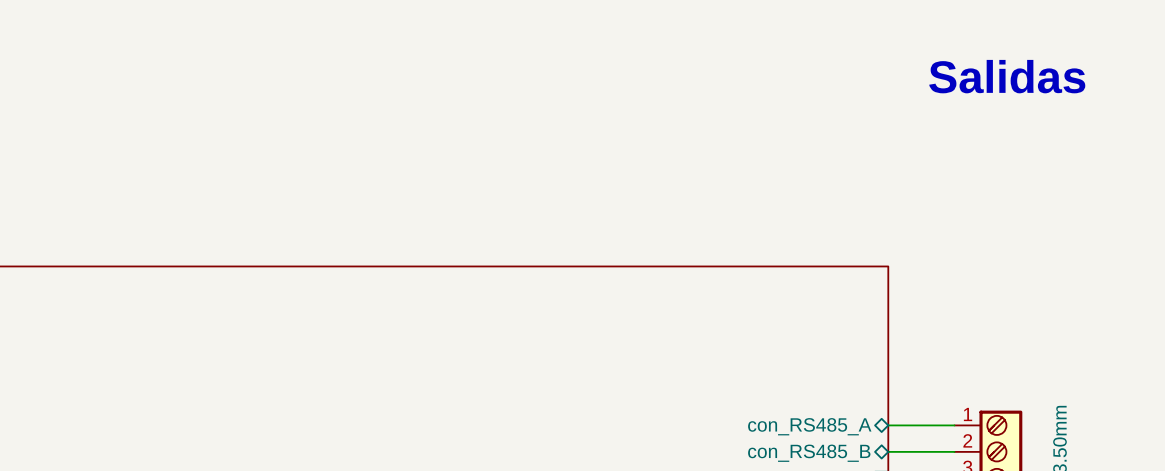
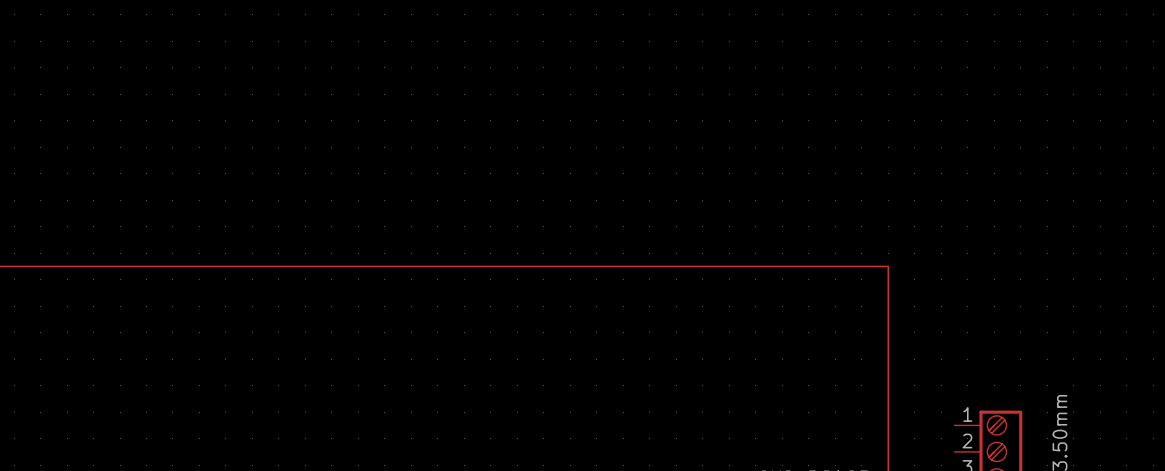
text: Salidas (1007, 76) -> none
wire: (888, 425) (954, 425) -> none
sheet pin: con_RS485_A (809, 426) -> none
wire: (888, 451) (954, 451) -> none
sheet pin: con_RS485_B (809, 453) -> none

